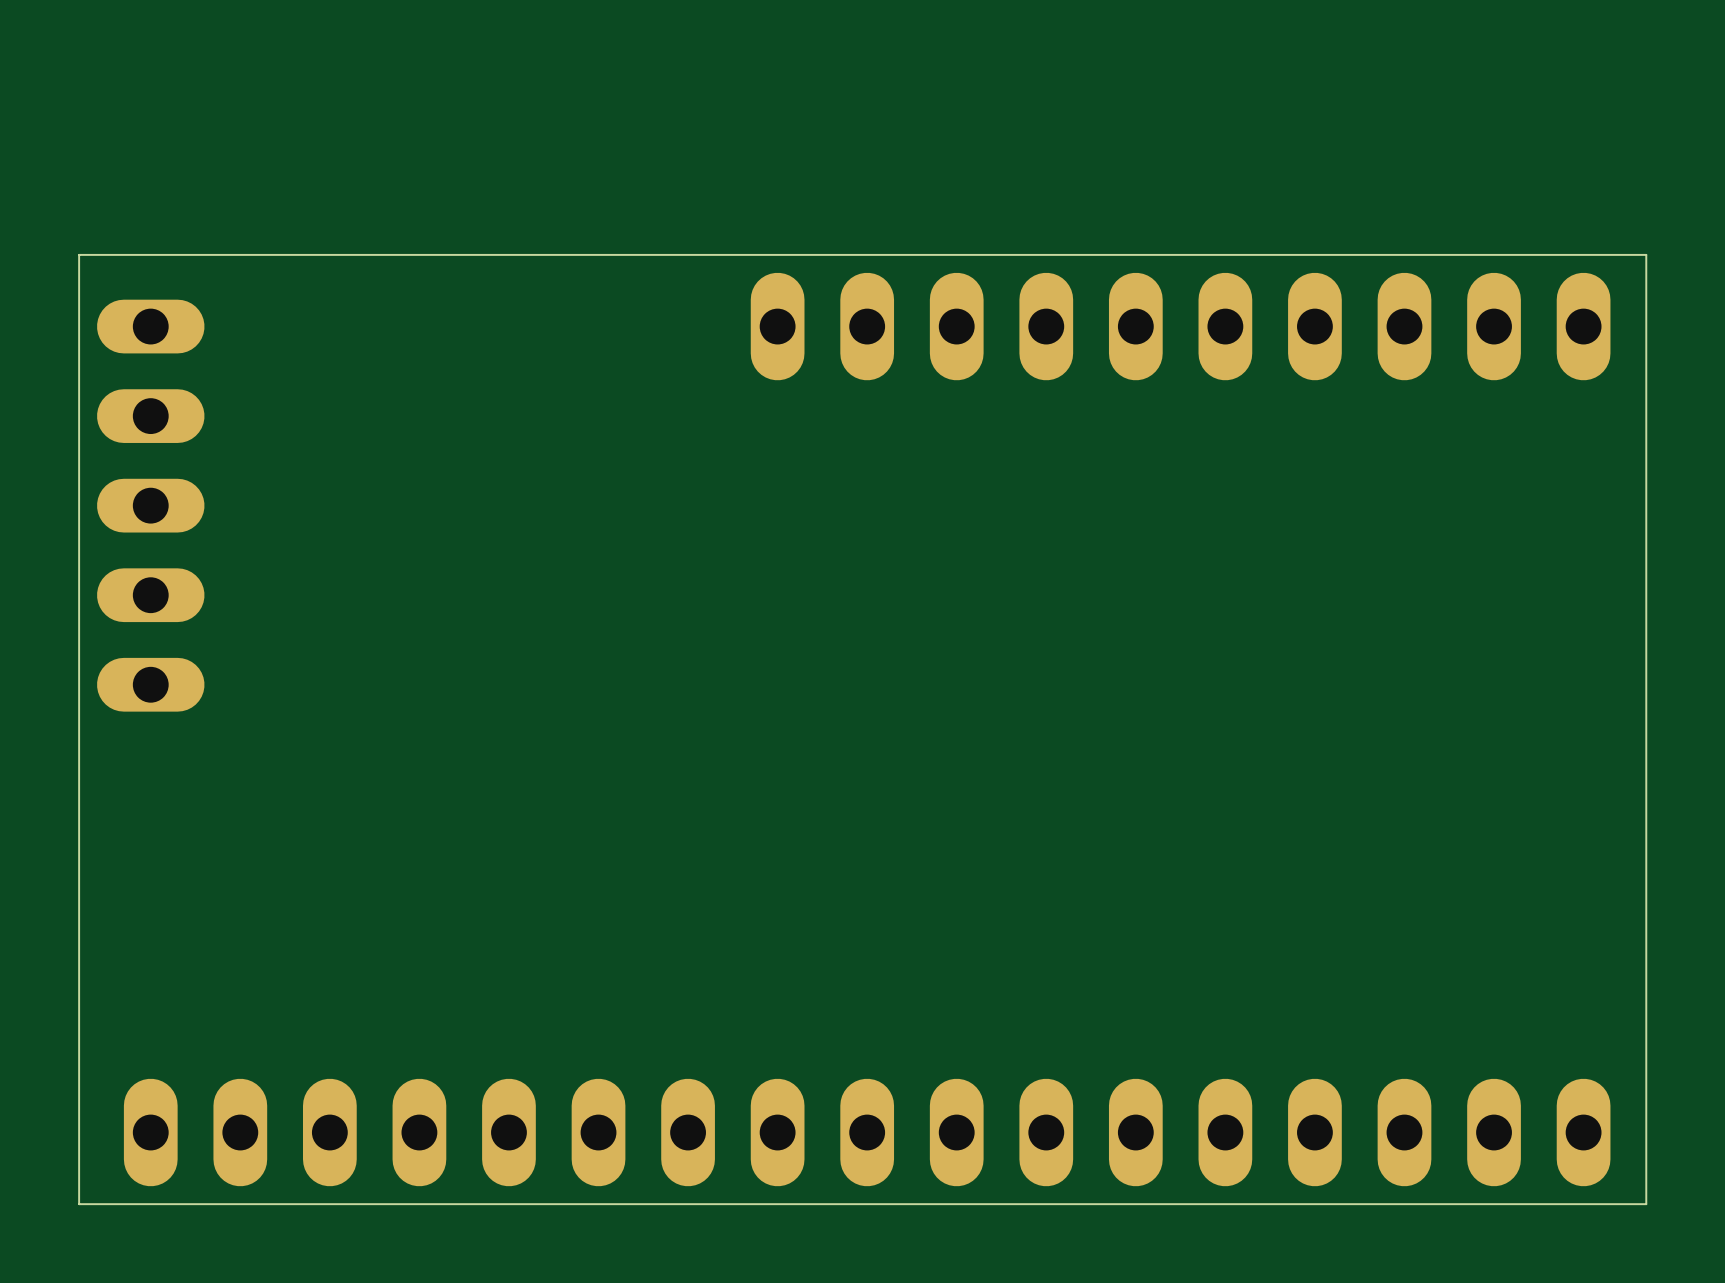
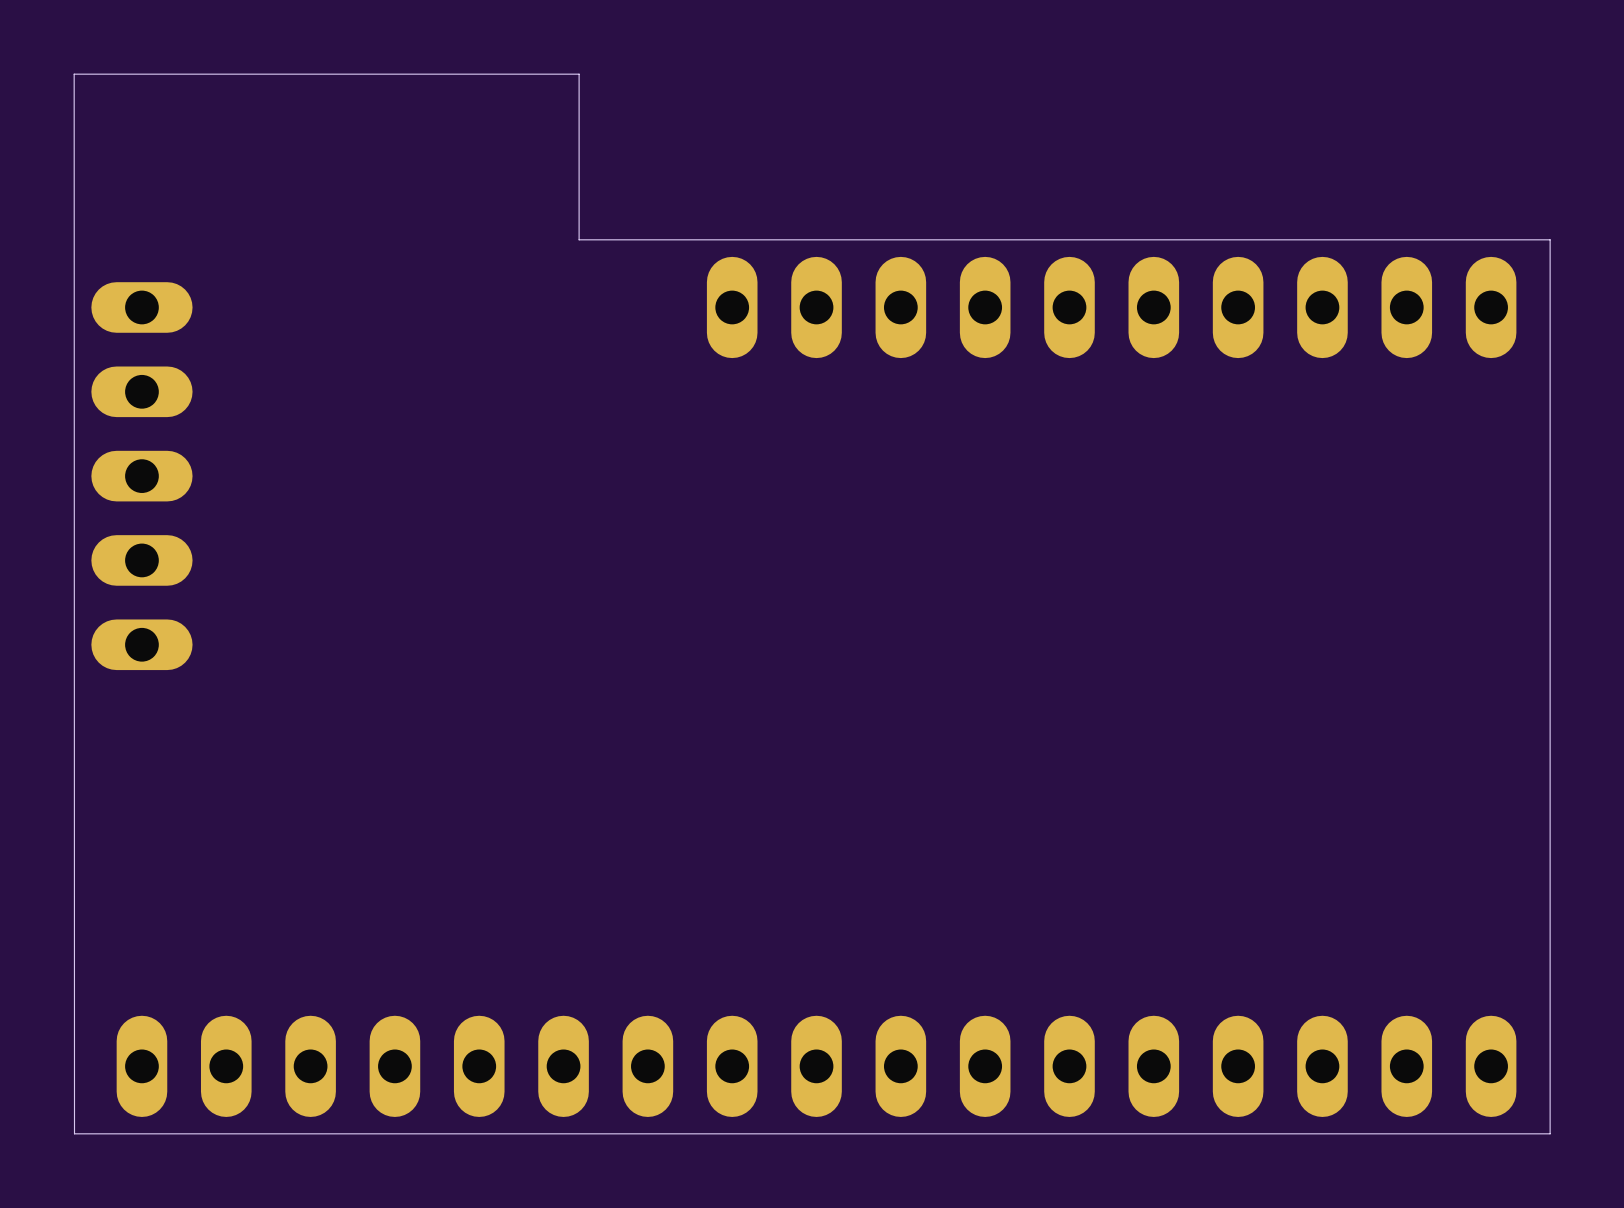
board edge: (1646, 254) (79, 254) (79, 1204) -> (1550, 239) (579, 239) (579, 74) (74, 74) (74, 1133)

